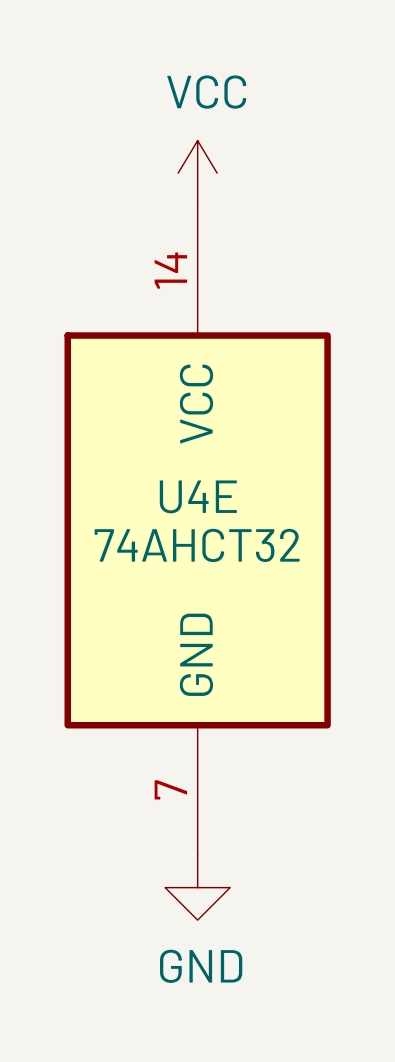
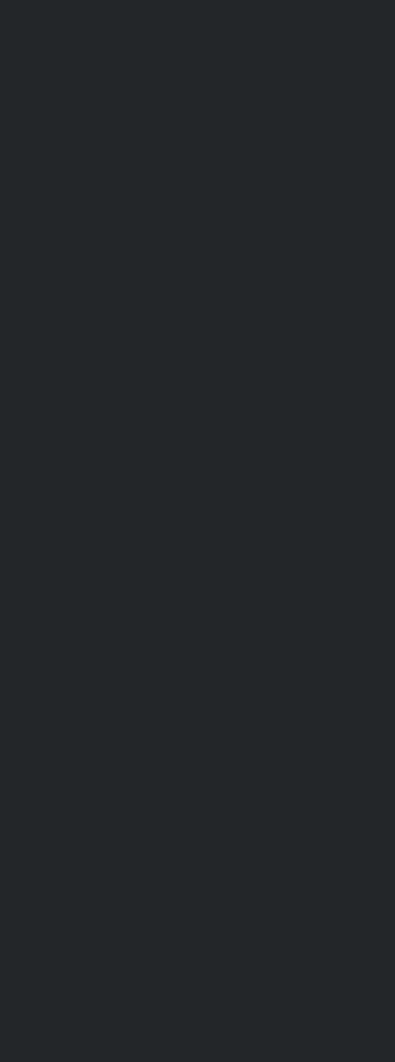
power symbol: VCC (197, 173) -> none
U4E: 74AHCT32 (197, 530) -> none
power symbol: GND (197, 887) -> none

